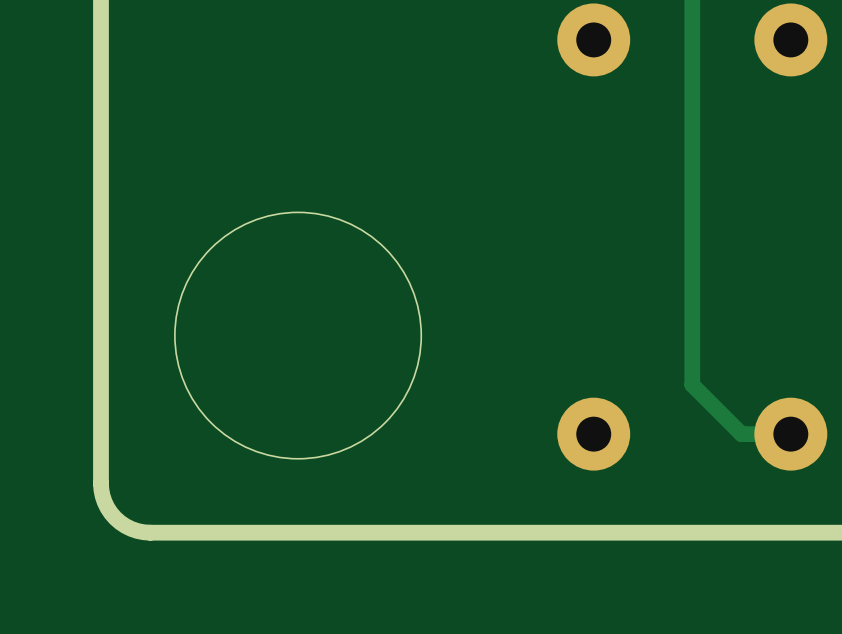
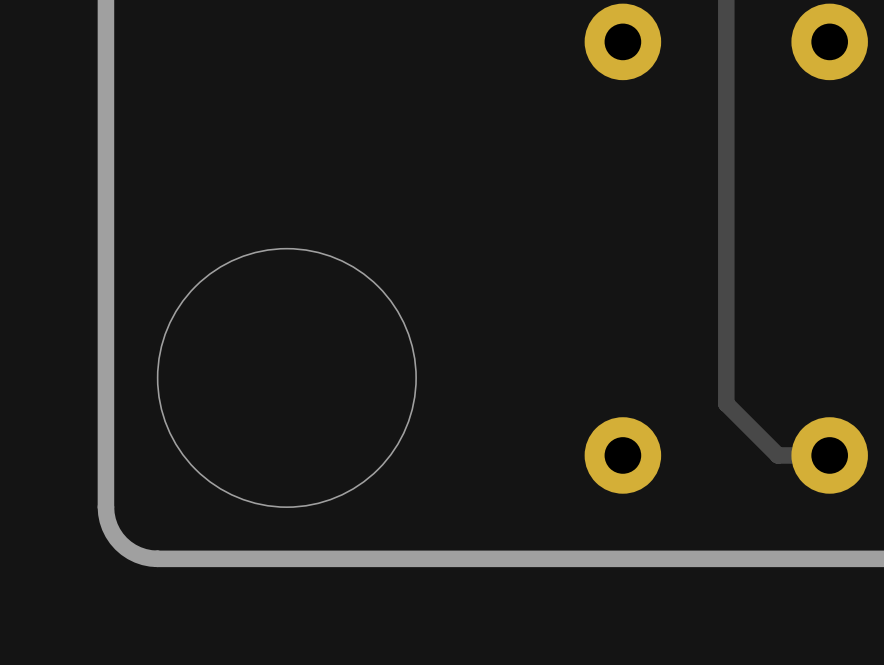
round board edge position: (298, 335) -> (286, 377)

